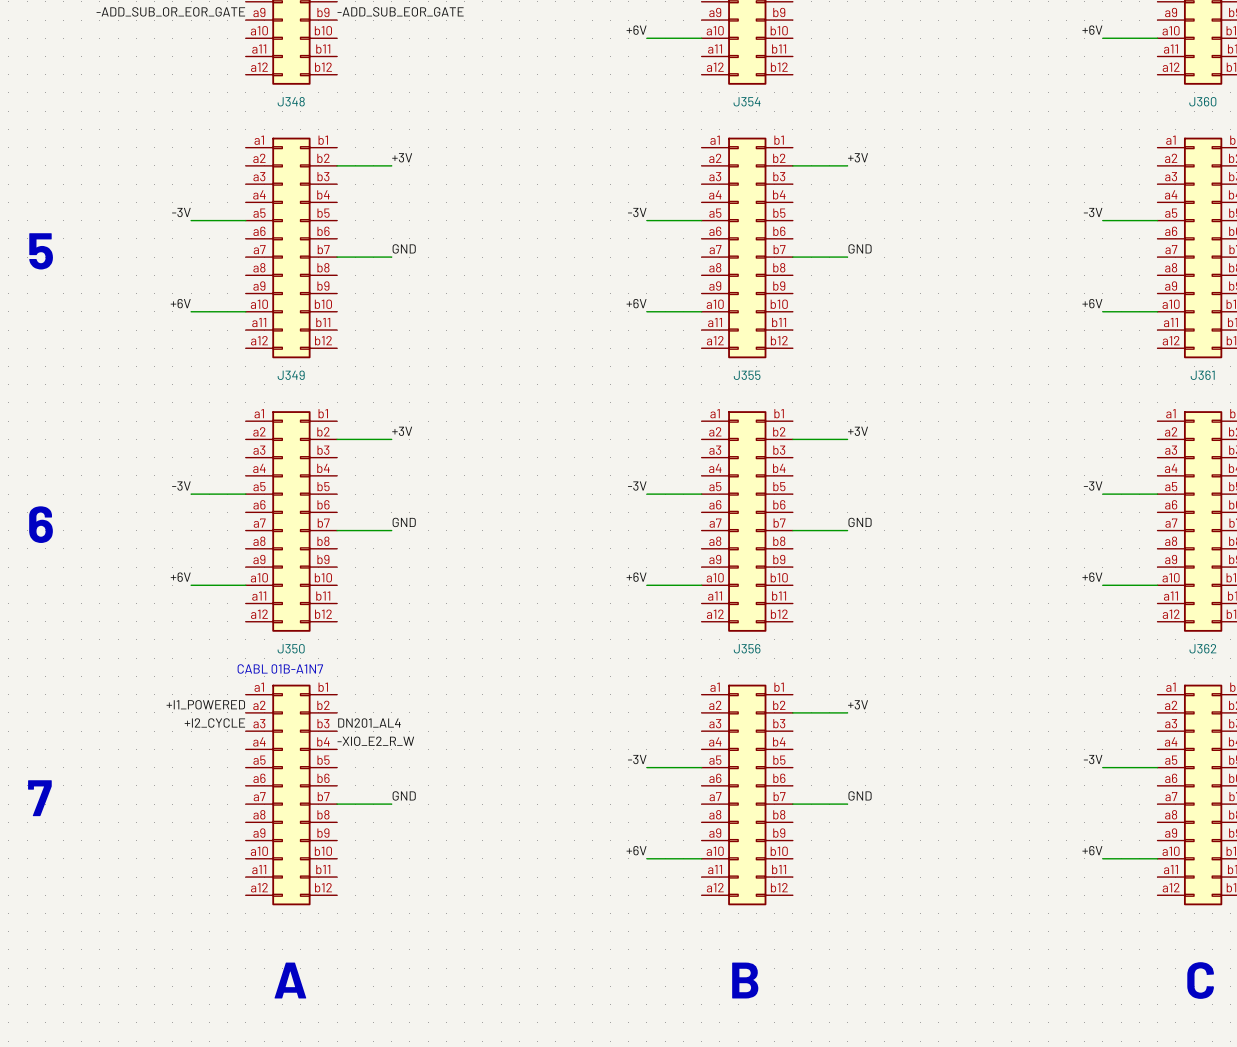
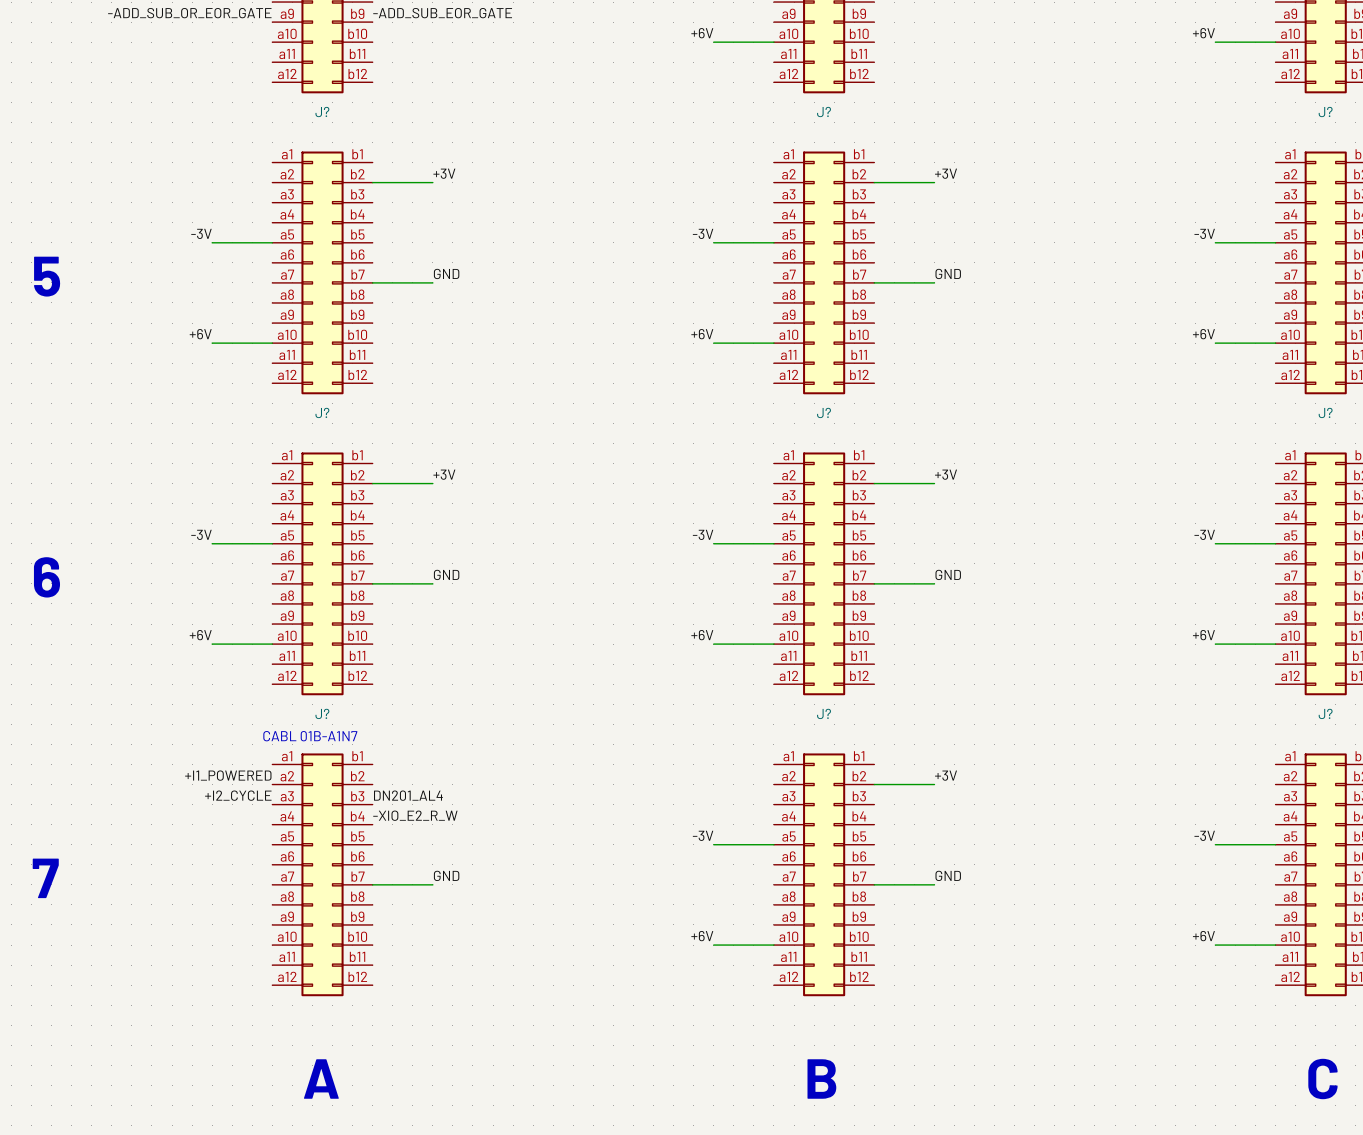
J348 name: J348 (291, 101) -> J? (322, 111)
J354 name: J354 (747, 101) -> J? (824, 111)
J360 name: J360 (1202, 101) -> J? (1325, 111)
J349 name: J349 (291, 375) -> J? (322, 412)
J355 name: J355 (747, 375) -> J? (824, 412)
J361 name: J361 (1202, 375) -> J? (1325, 412)
J350 name: J350 (291, 648) -> J? (322, 713)
J356 name: J356 (747, 648) -> J? (824, 713)
J362 name: J362 (1202, 648) -> J? (1325, 713)

